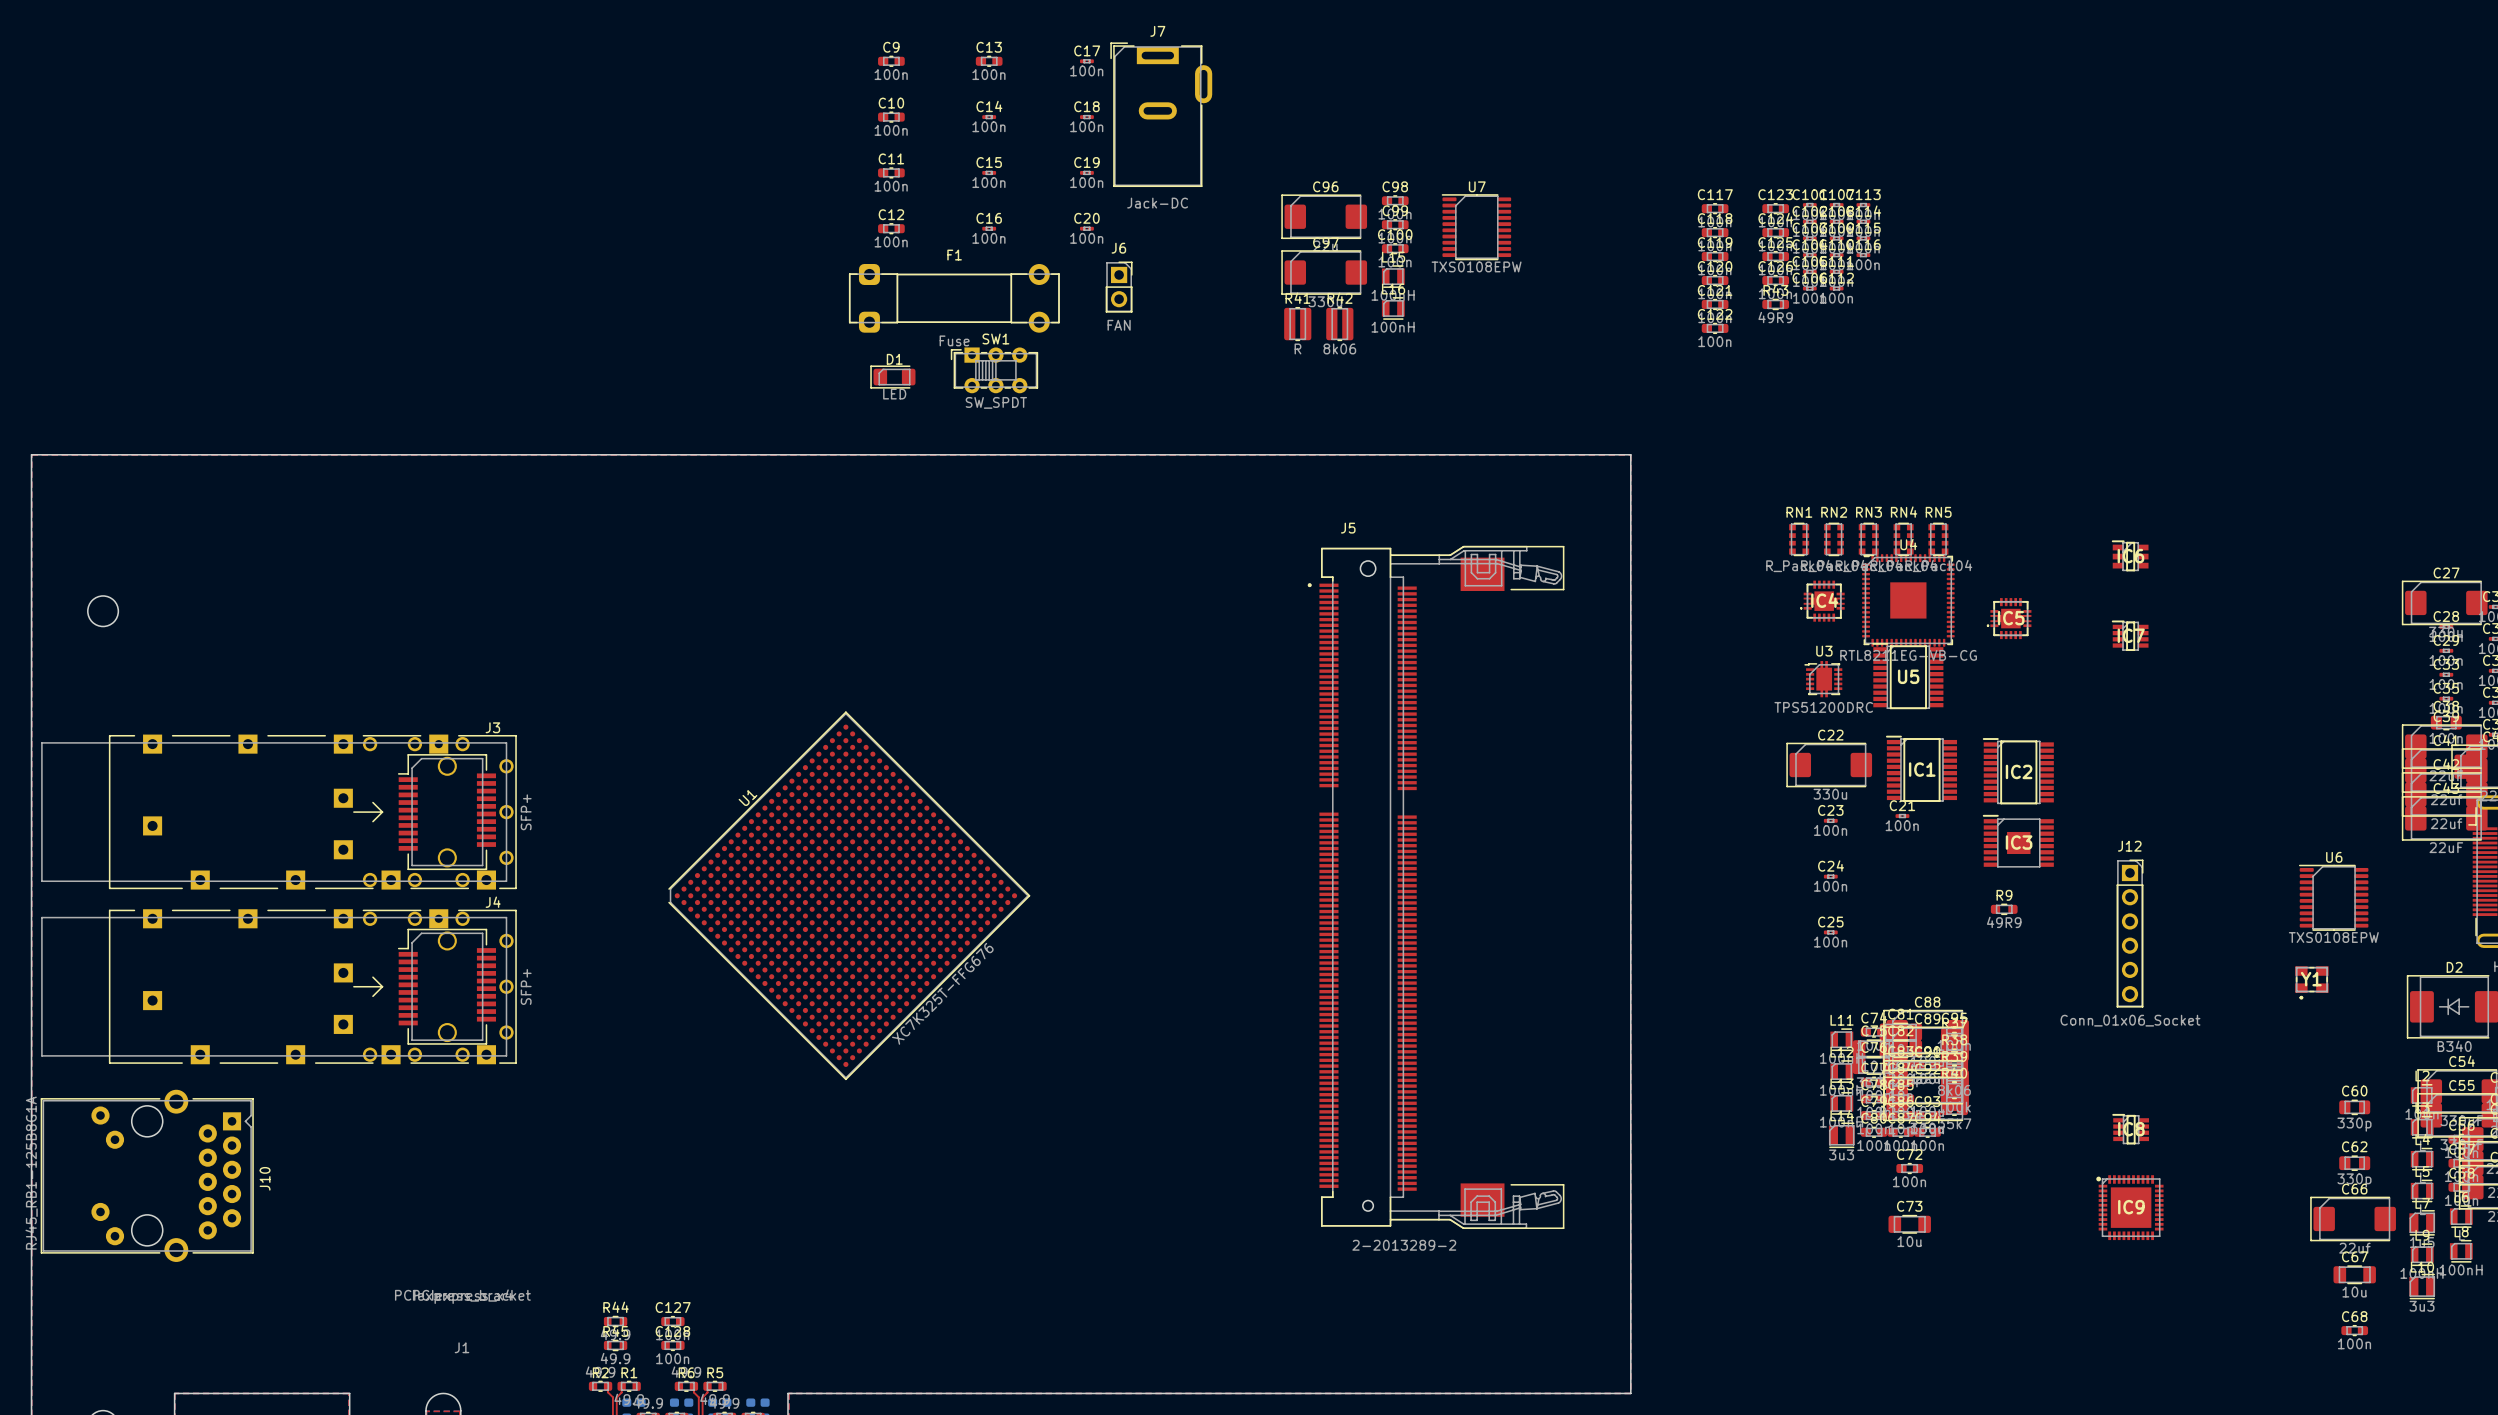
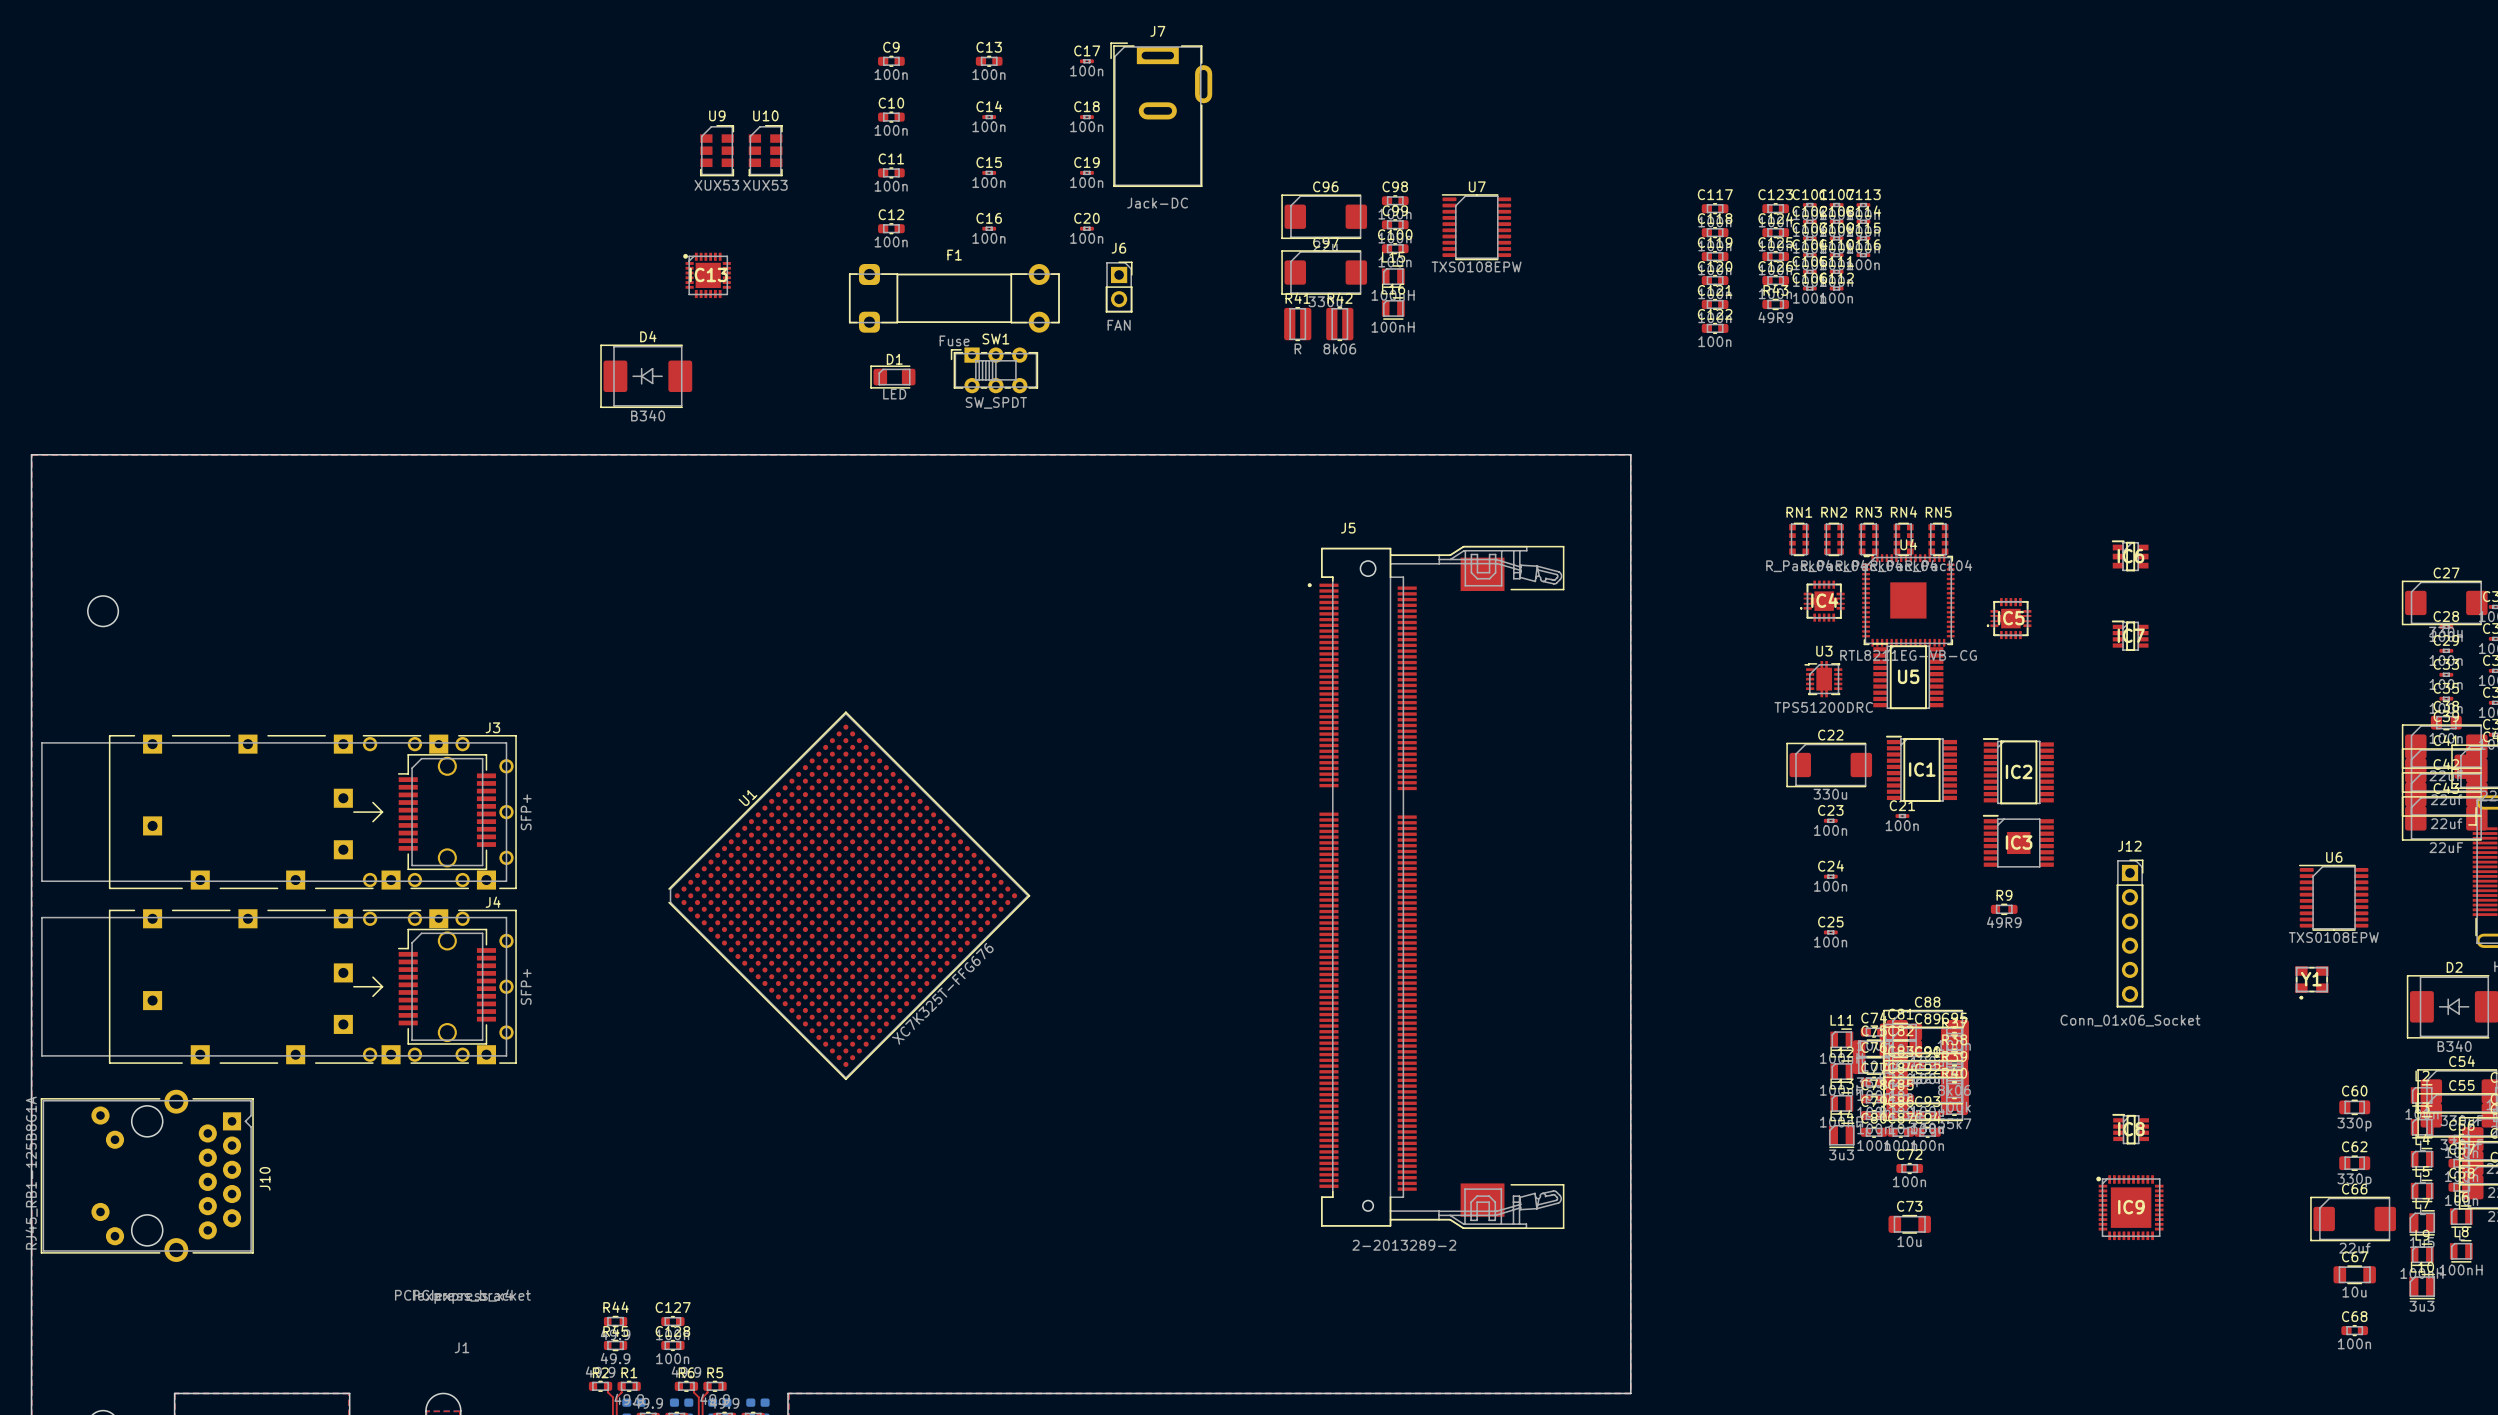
U9: none -> XUX53 (717, 150)
U10: none -> XUX53 (765, 150)
IC13: none -> (707, 275)
D4: none -> B340 (646, 376)

